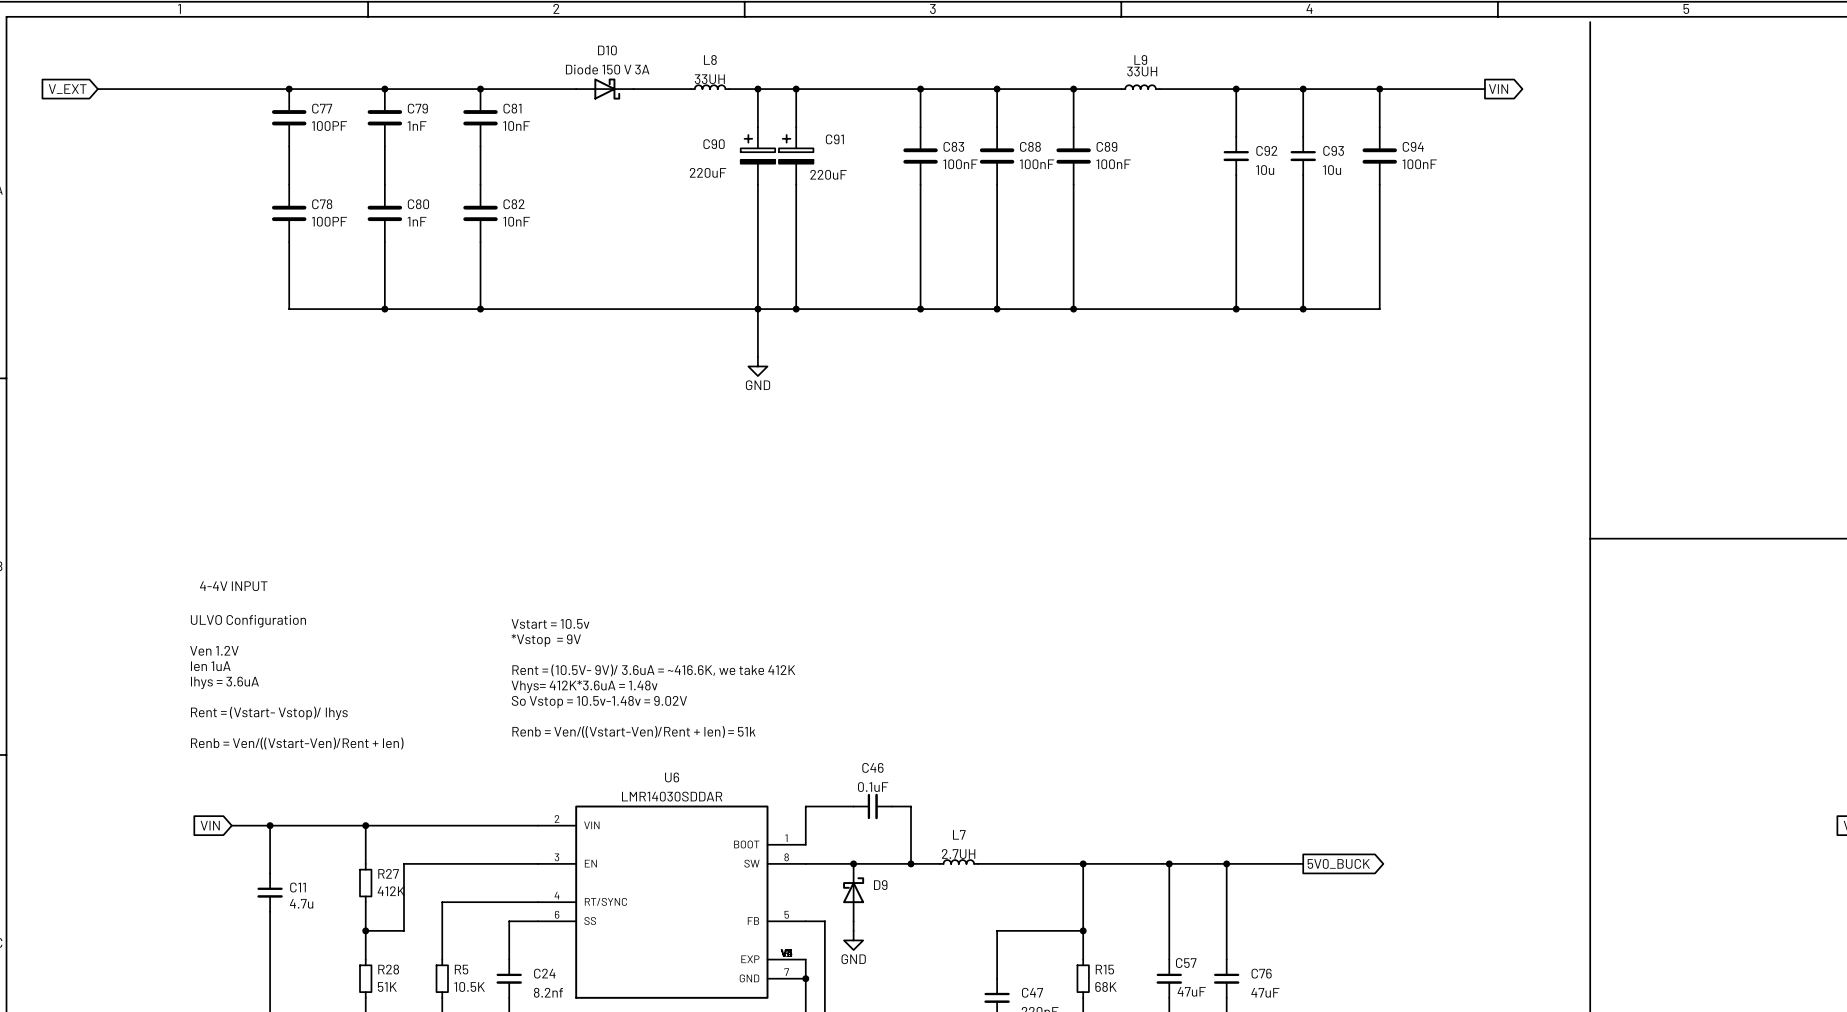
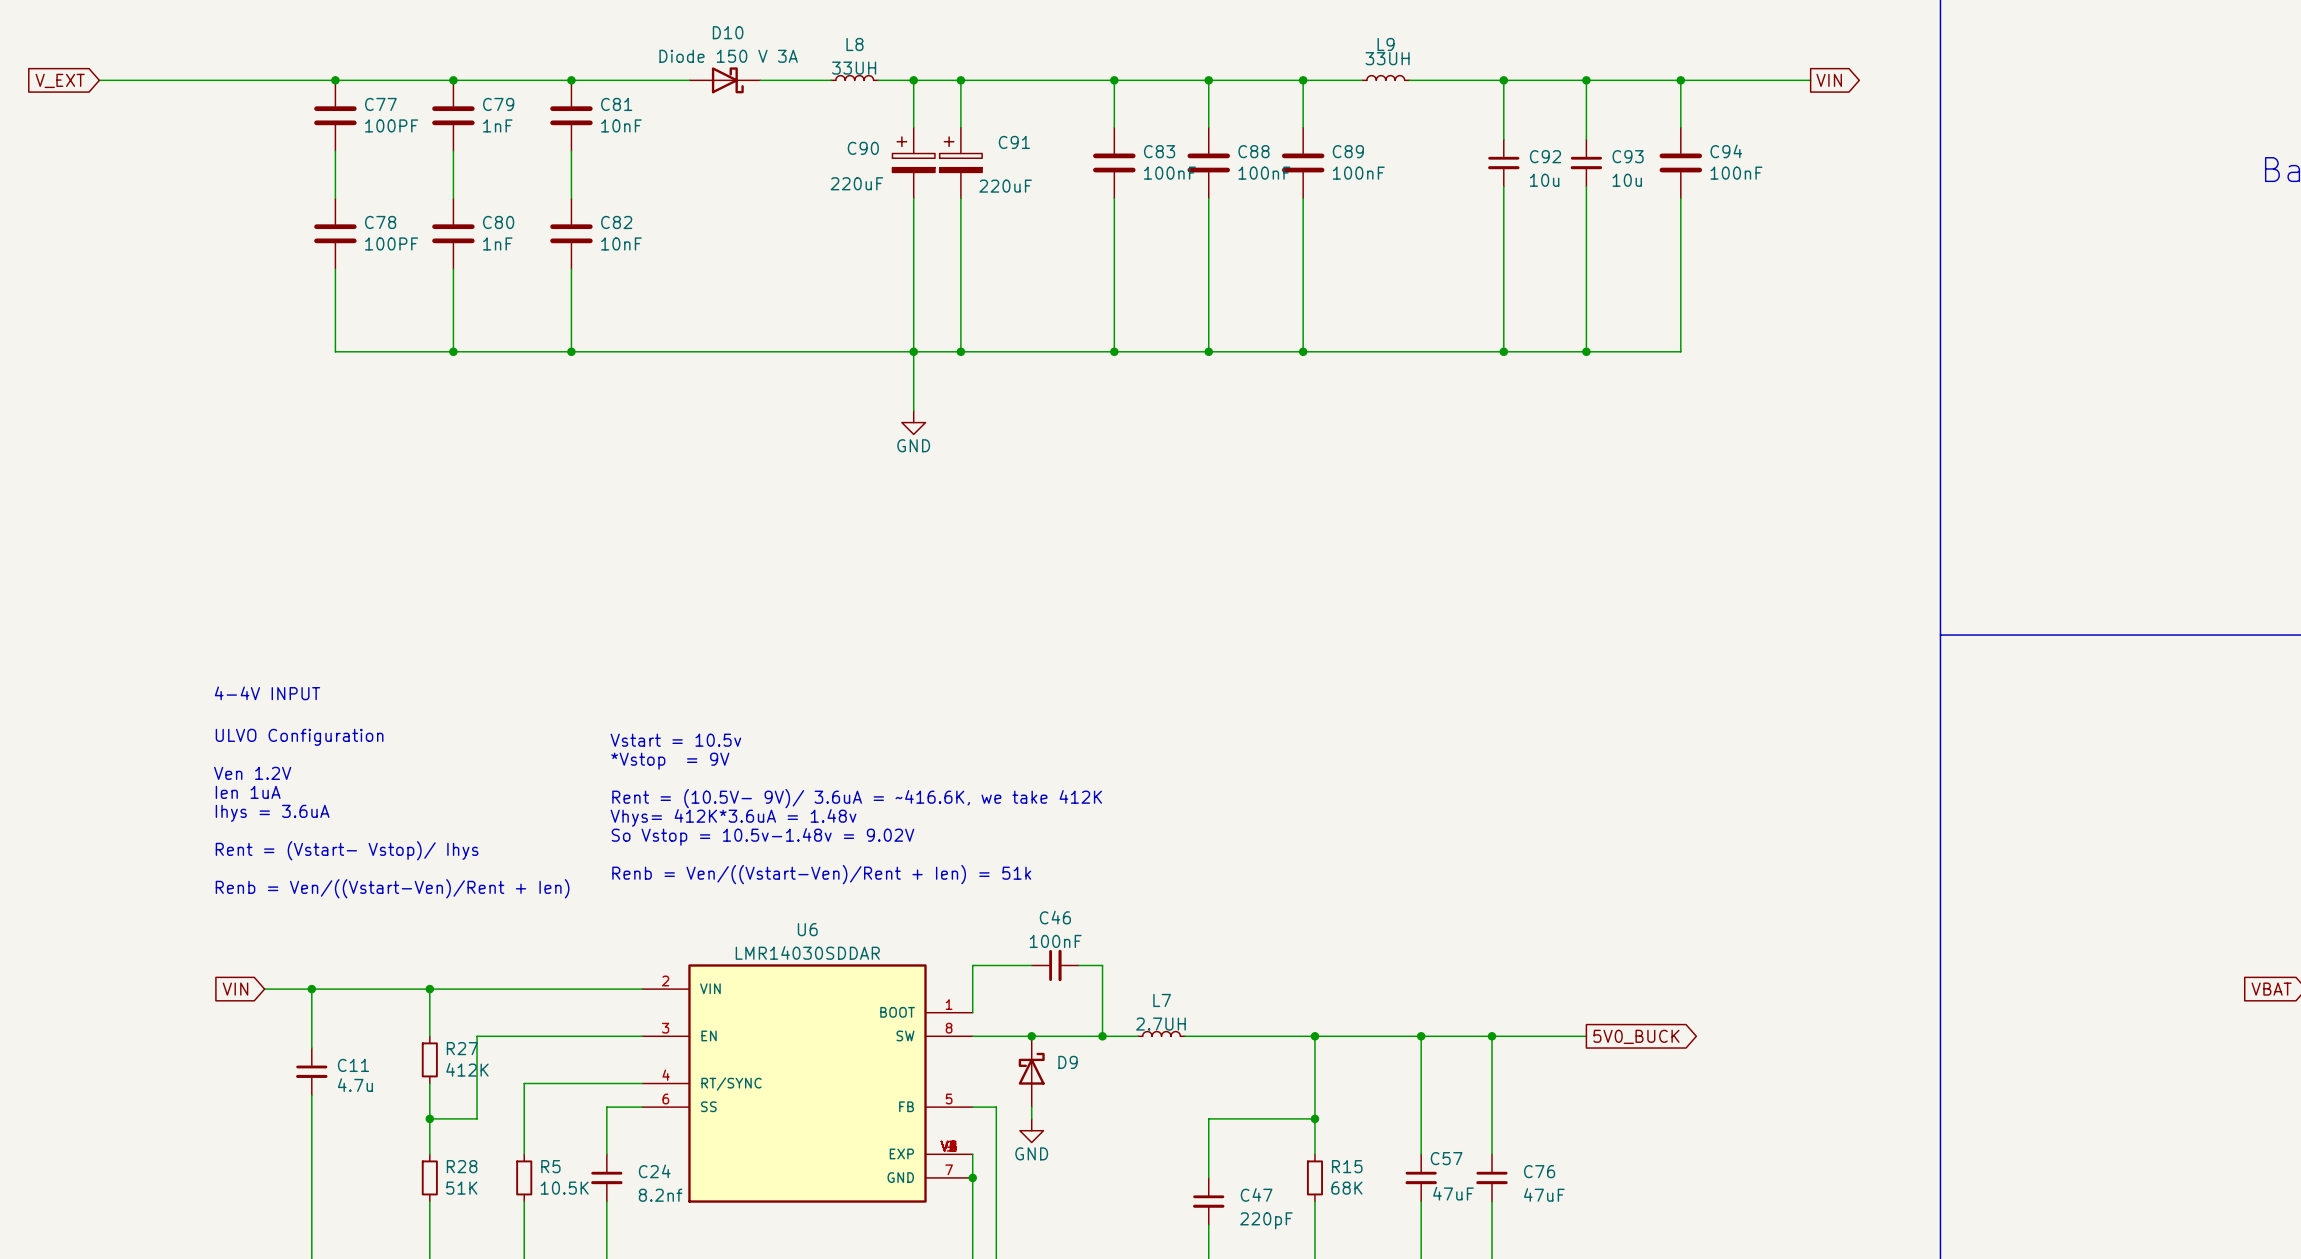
C46 value: 0.1uF (873, 787) -> 100nF (1055, 941)

